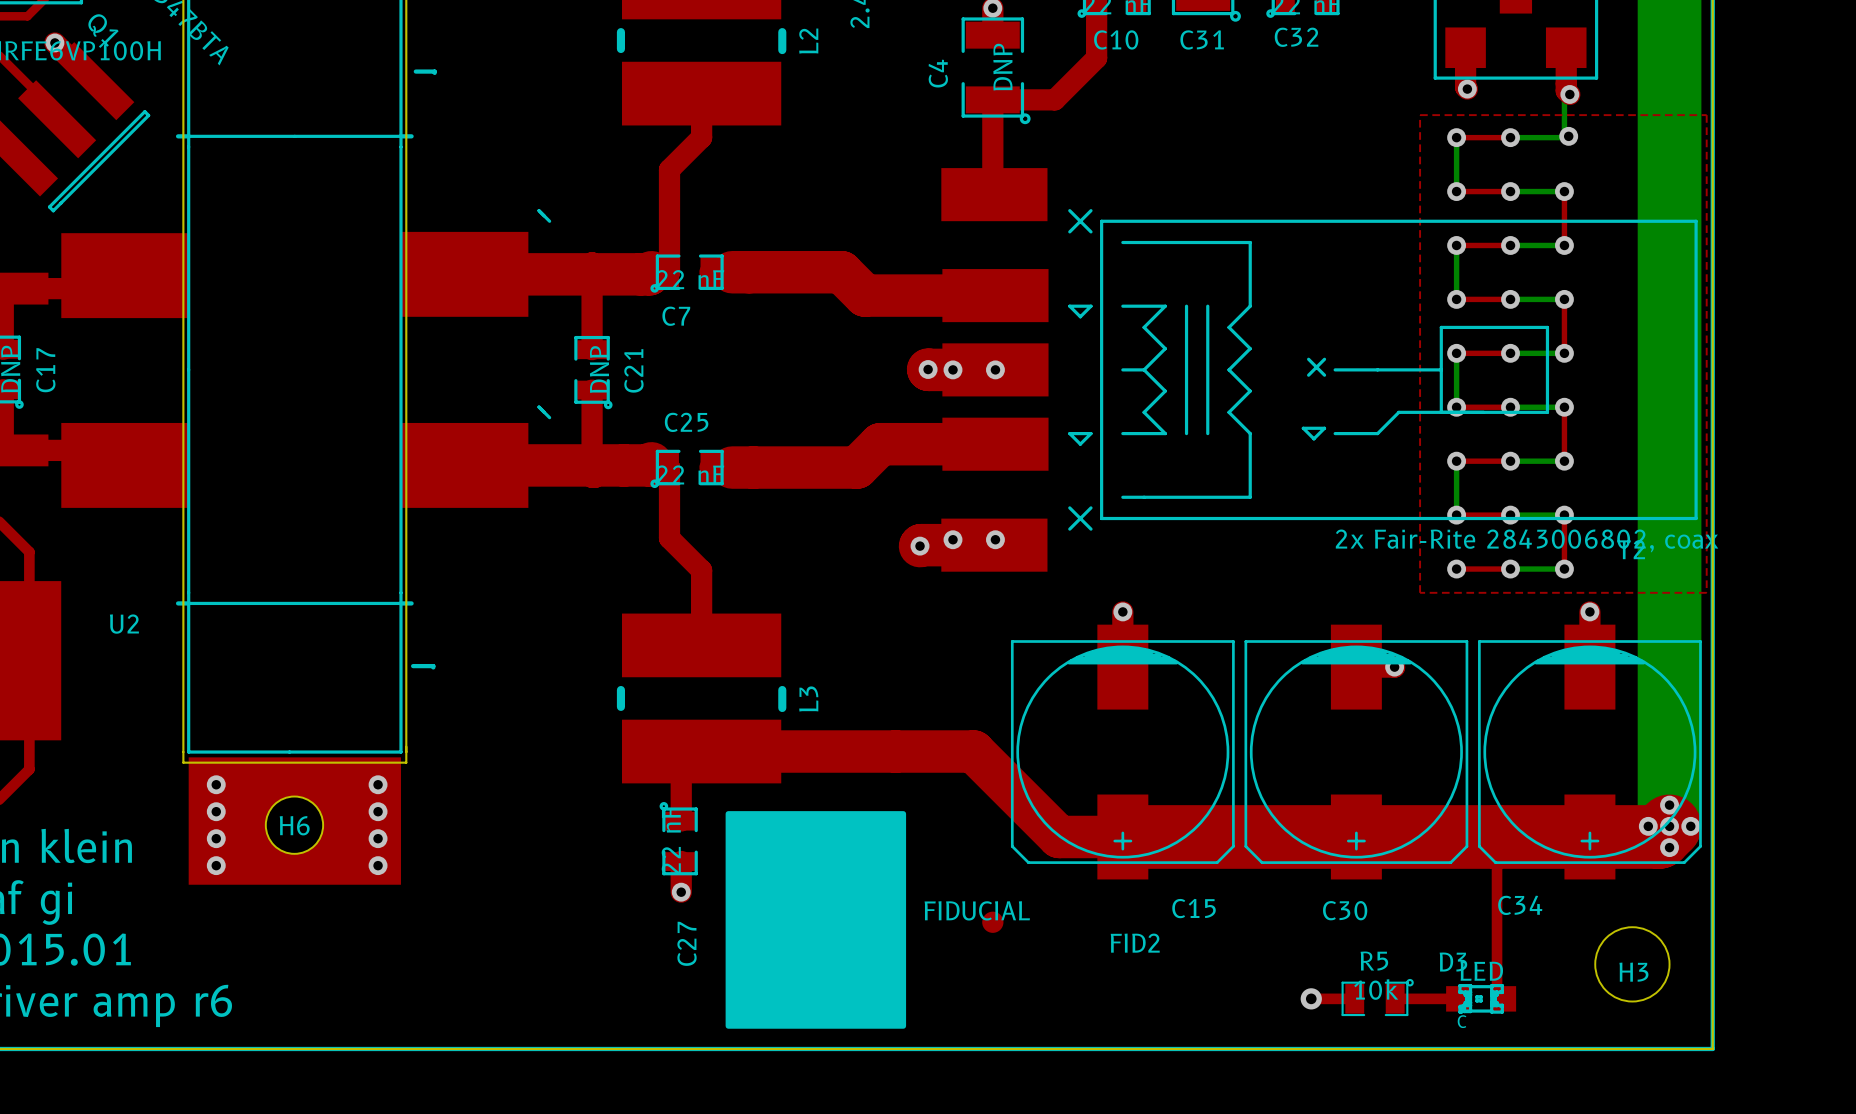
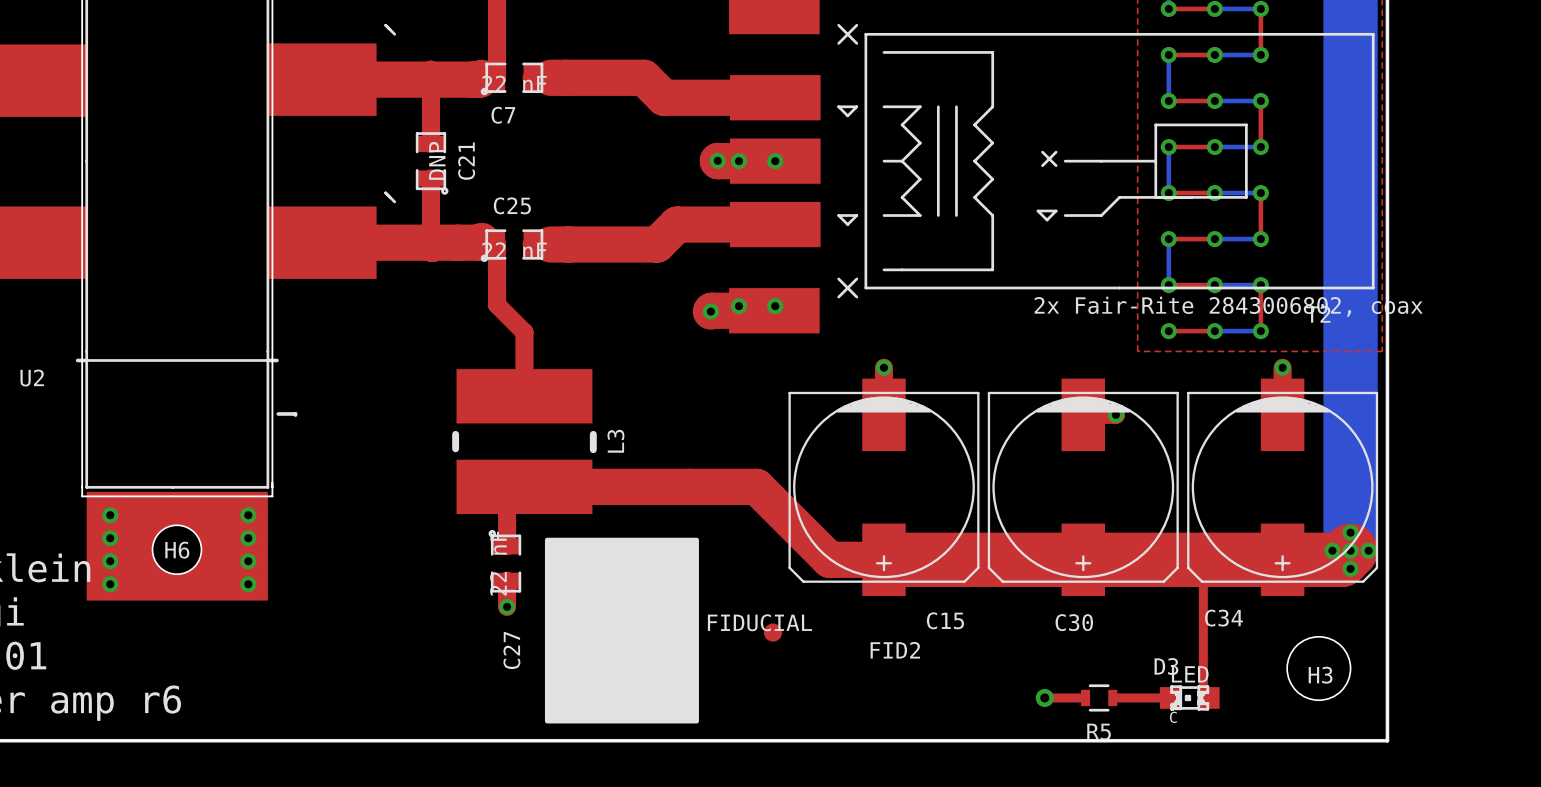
R5 name position: R5 (1374, 961) -> R5 (1099, 731)
R5 footprint: [1341, 978, 1414, 1017] -> [1081, 684, 1118, 712]
R5 value: 10k (1376, 989) -> none

